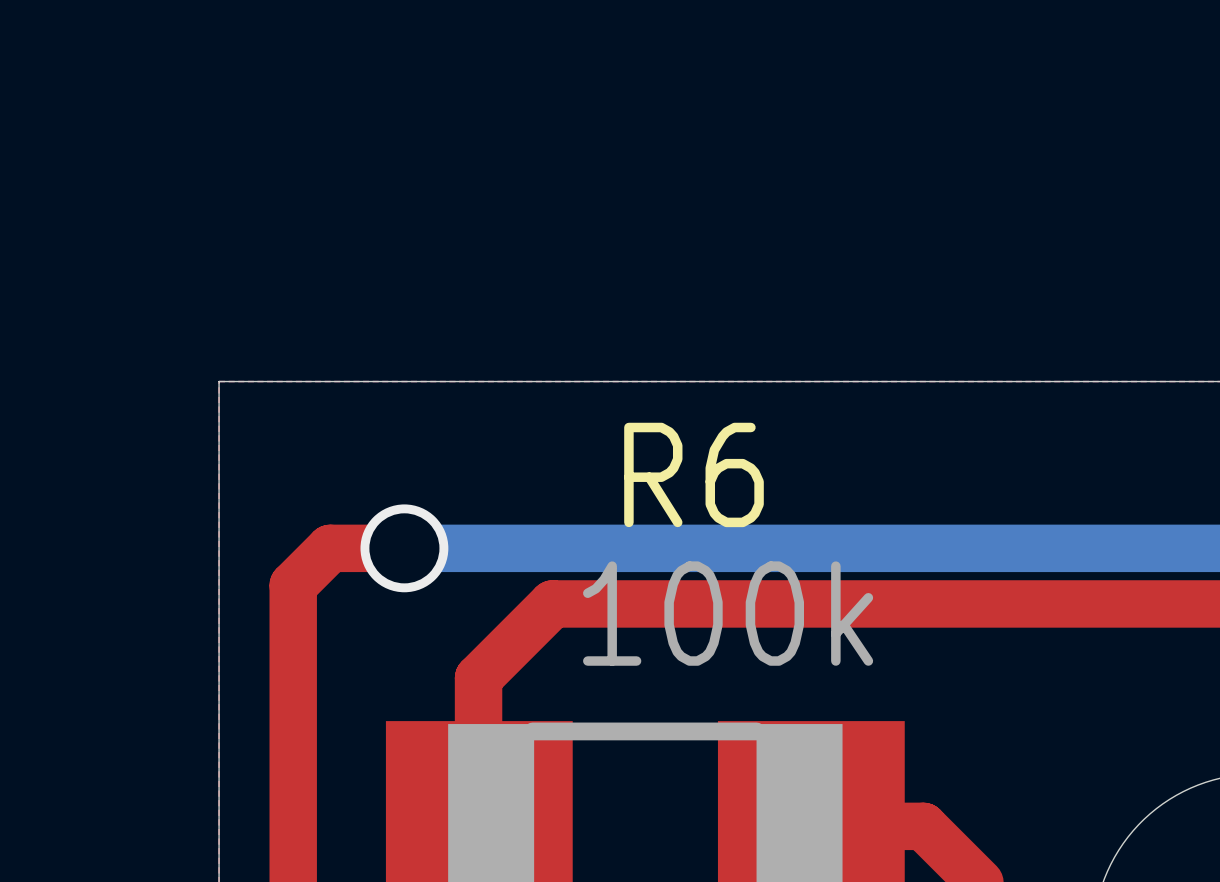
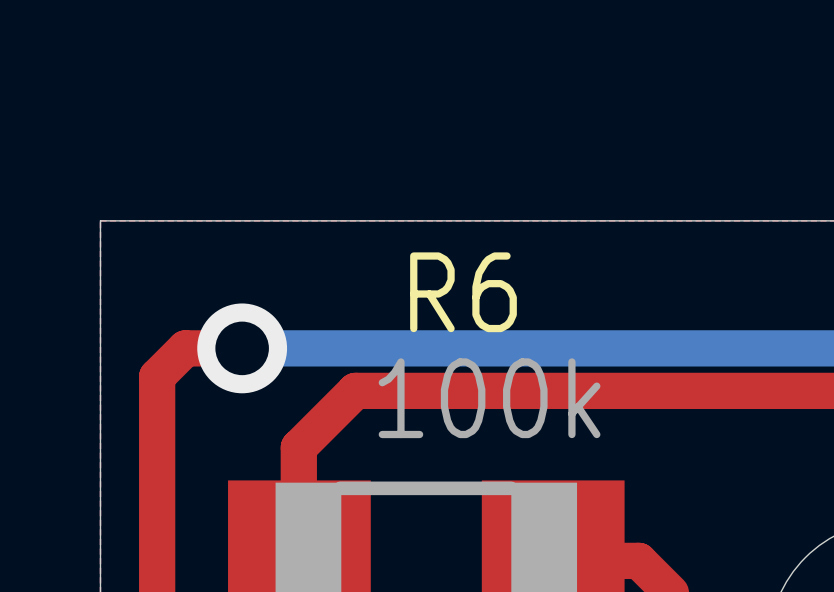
via size: [360, 504, 449, 593] -> [197, 303, 288, 394]

